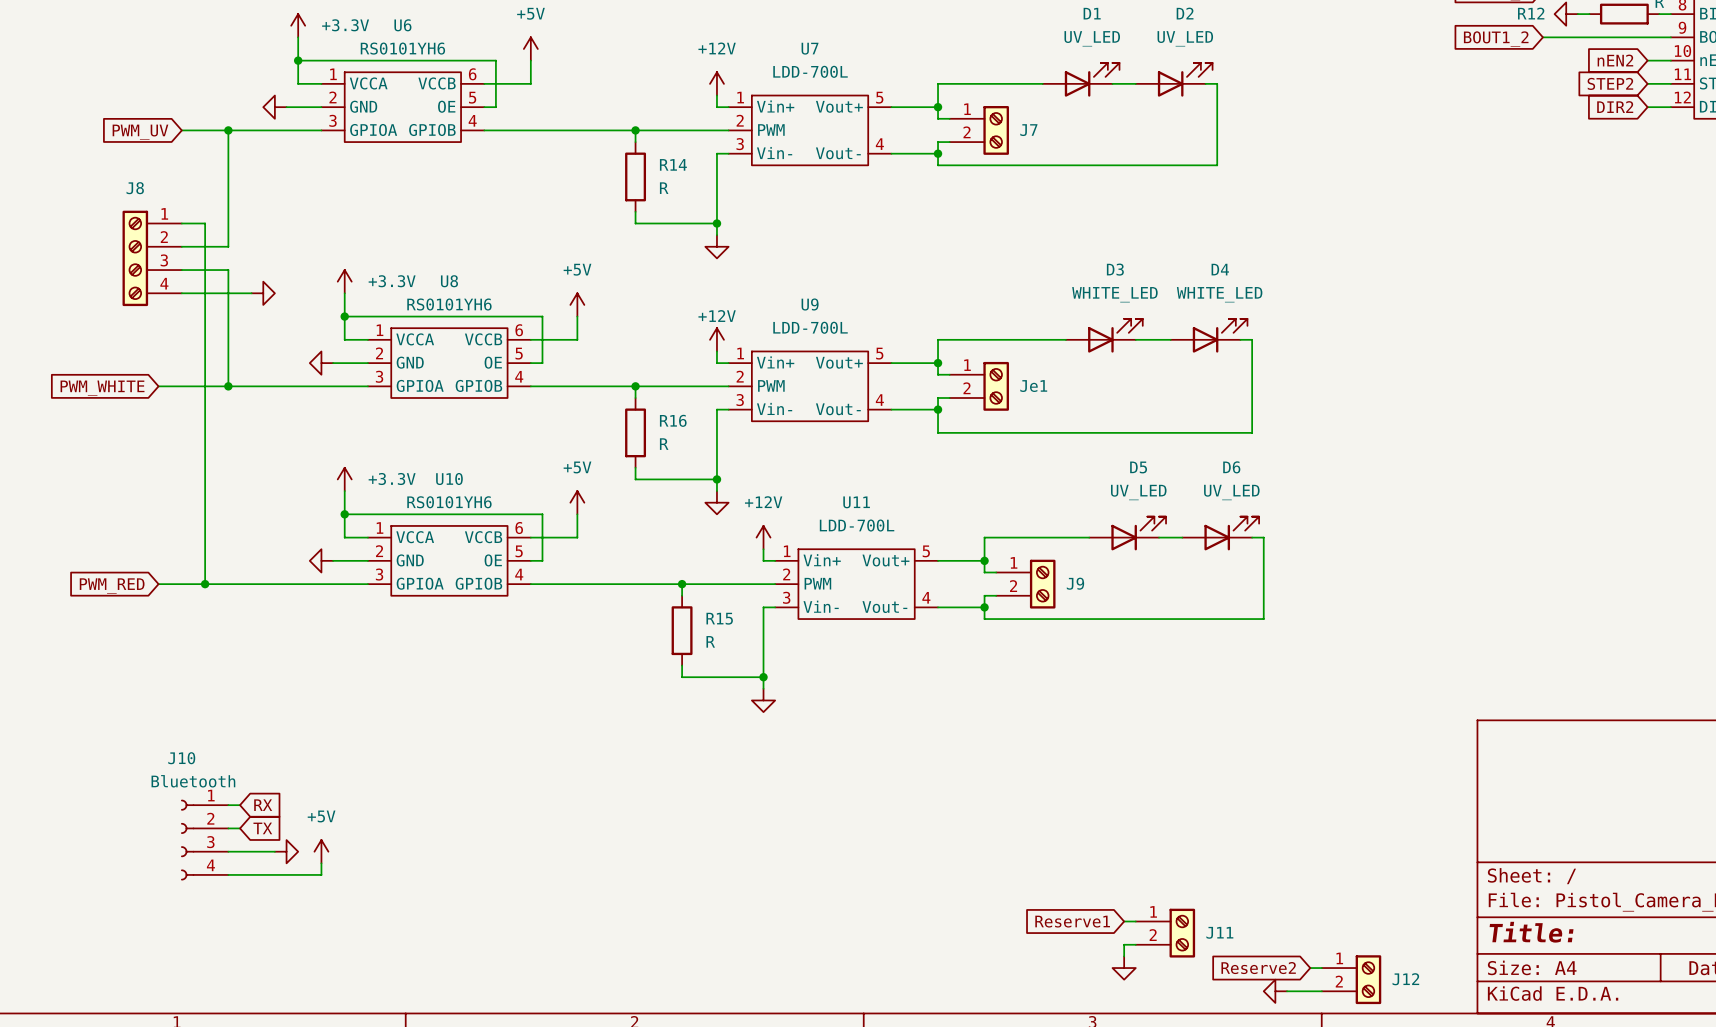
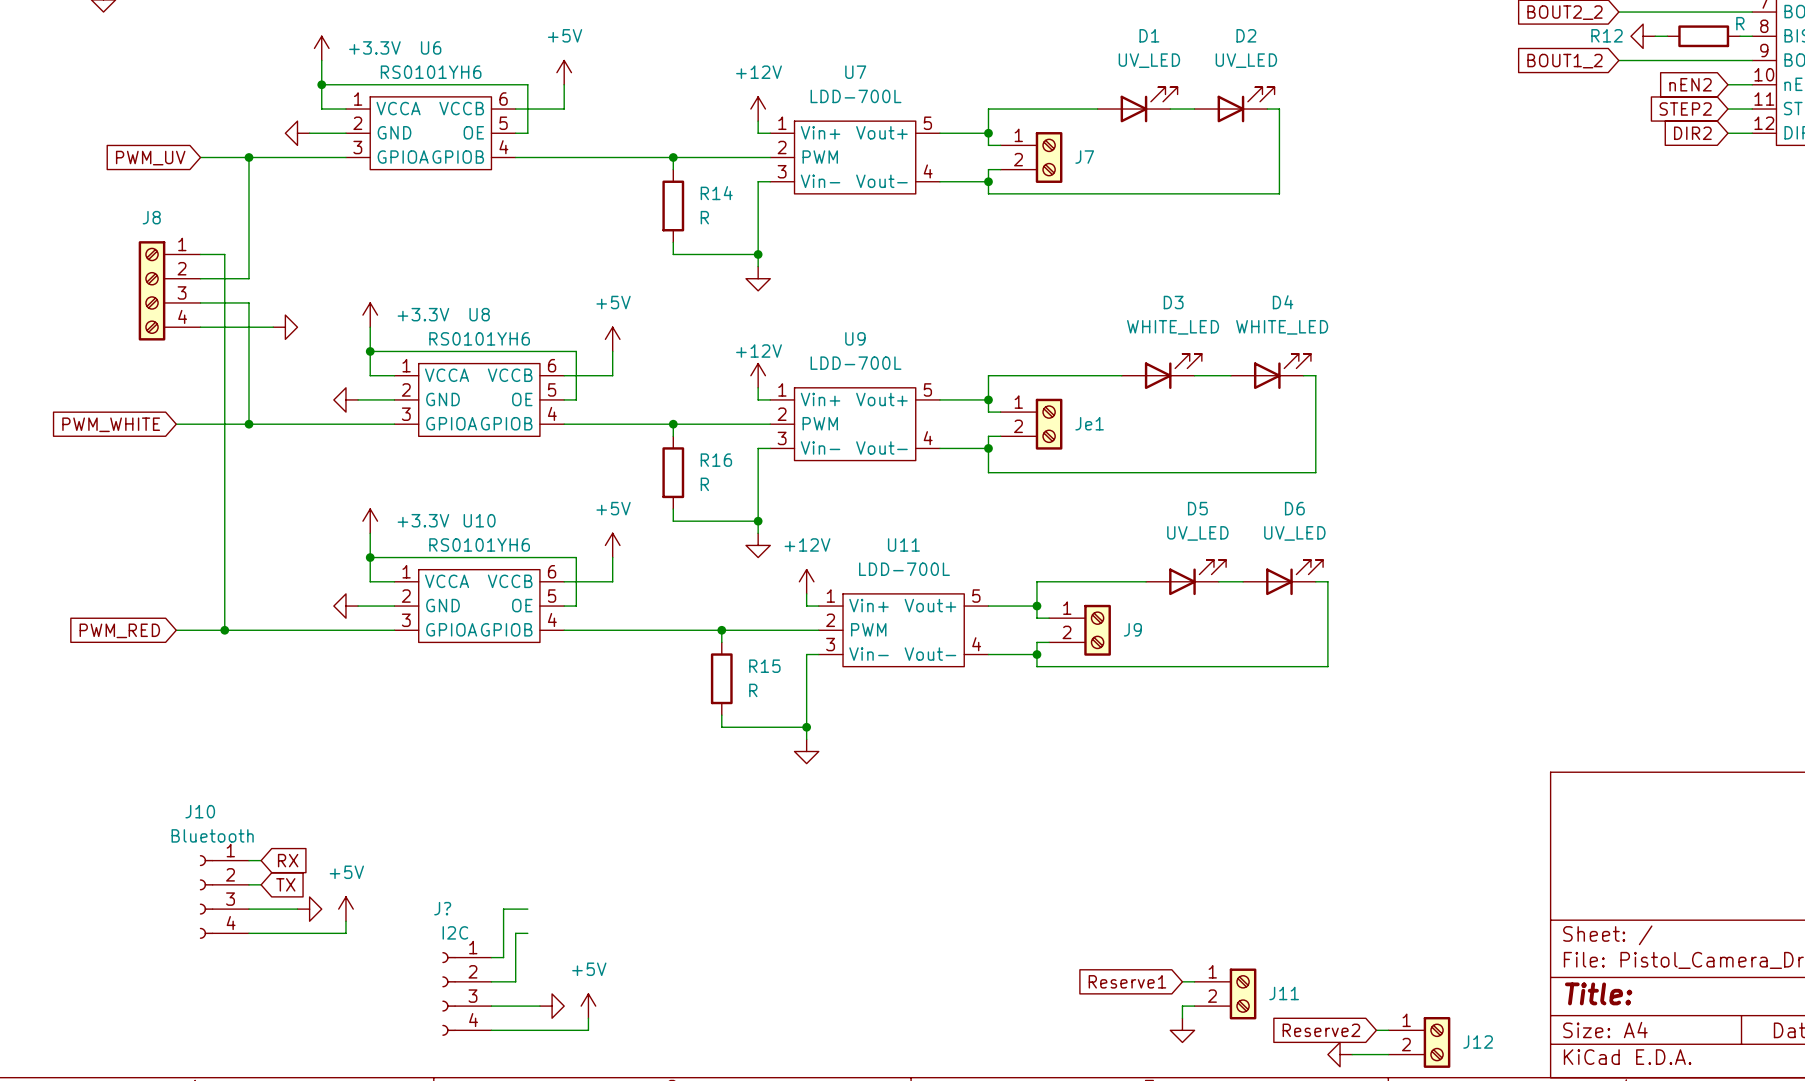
wire: none -> (527, 909) (503, 909) (503, 957) (491, 957)
wire: none -> (527, 933) (515, 933) (515, 981) (491, 981)
J?: none -> I2C (466, 993)
wire: none -> (491, 1006) (539, 1006)
power symbol: none -> (552, 1006)
power symbol: none -> +5V (588, 1006)
wire: none -> (588, 1018) (588, 1030) (491, 1030)

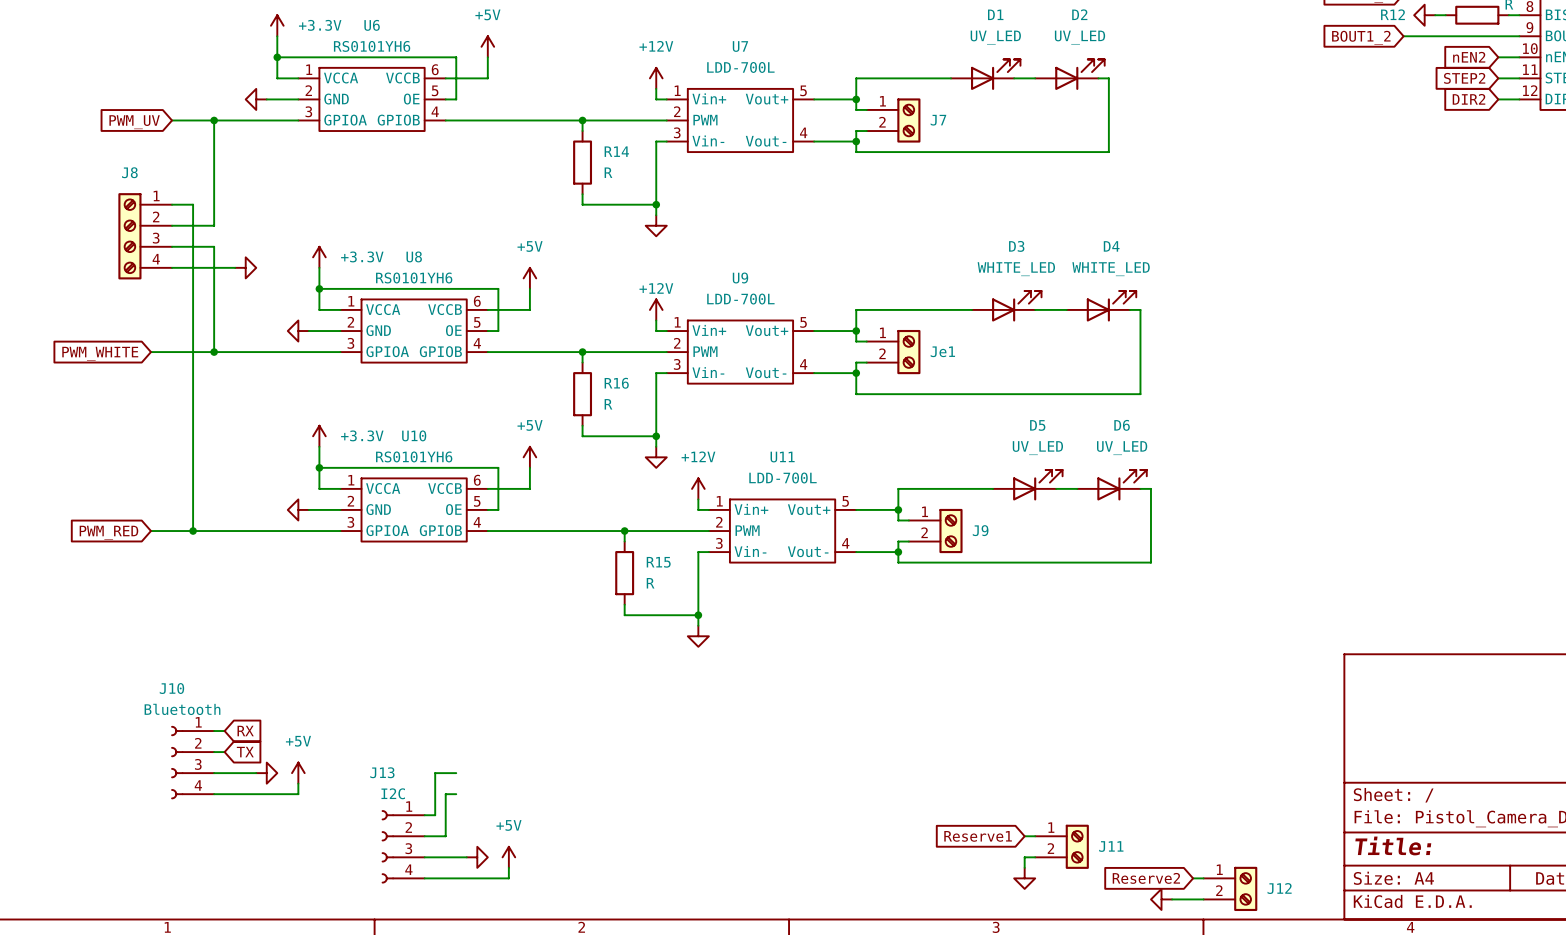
J? name: J? (442, 908) -> J13 (382, 772)

